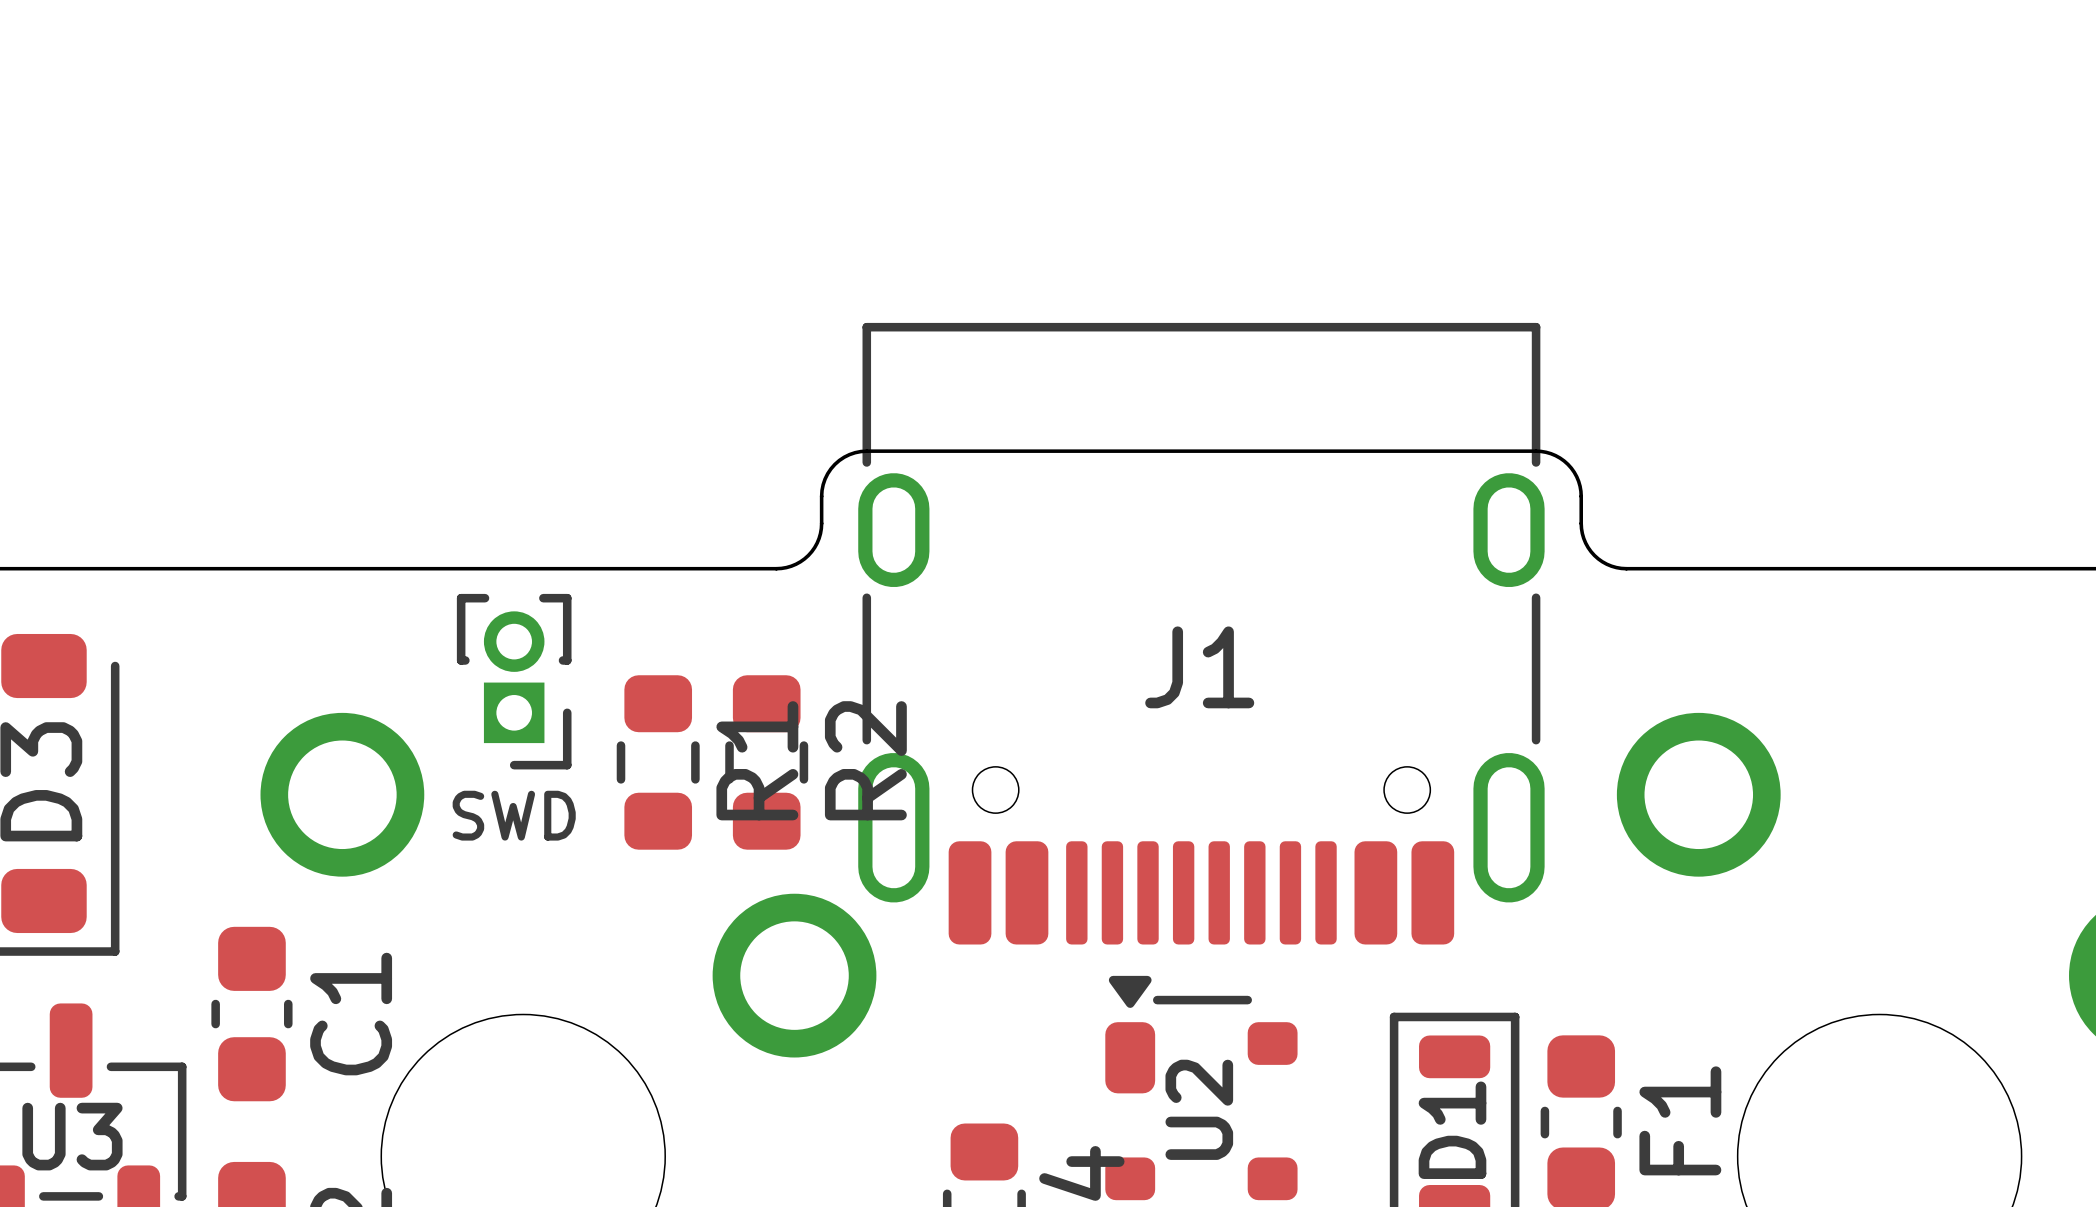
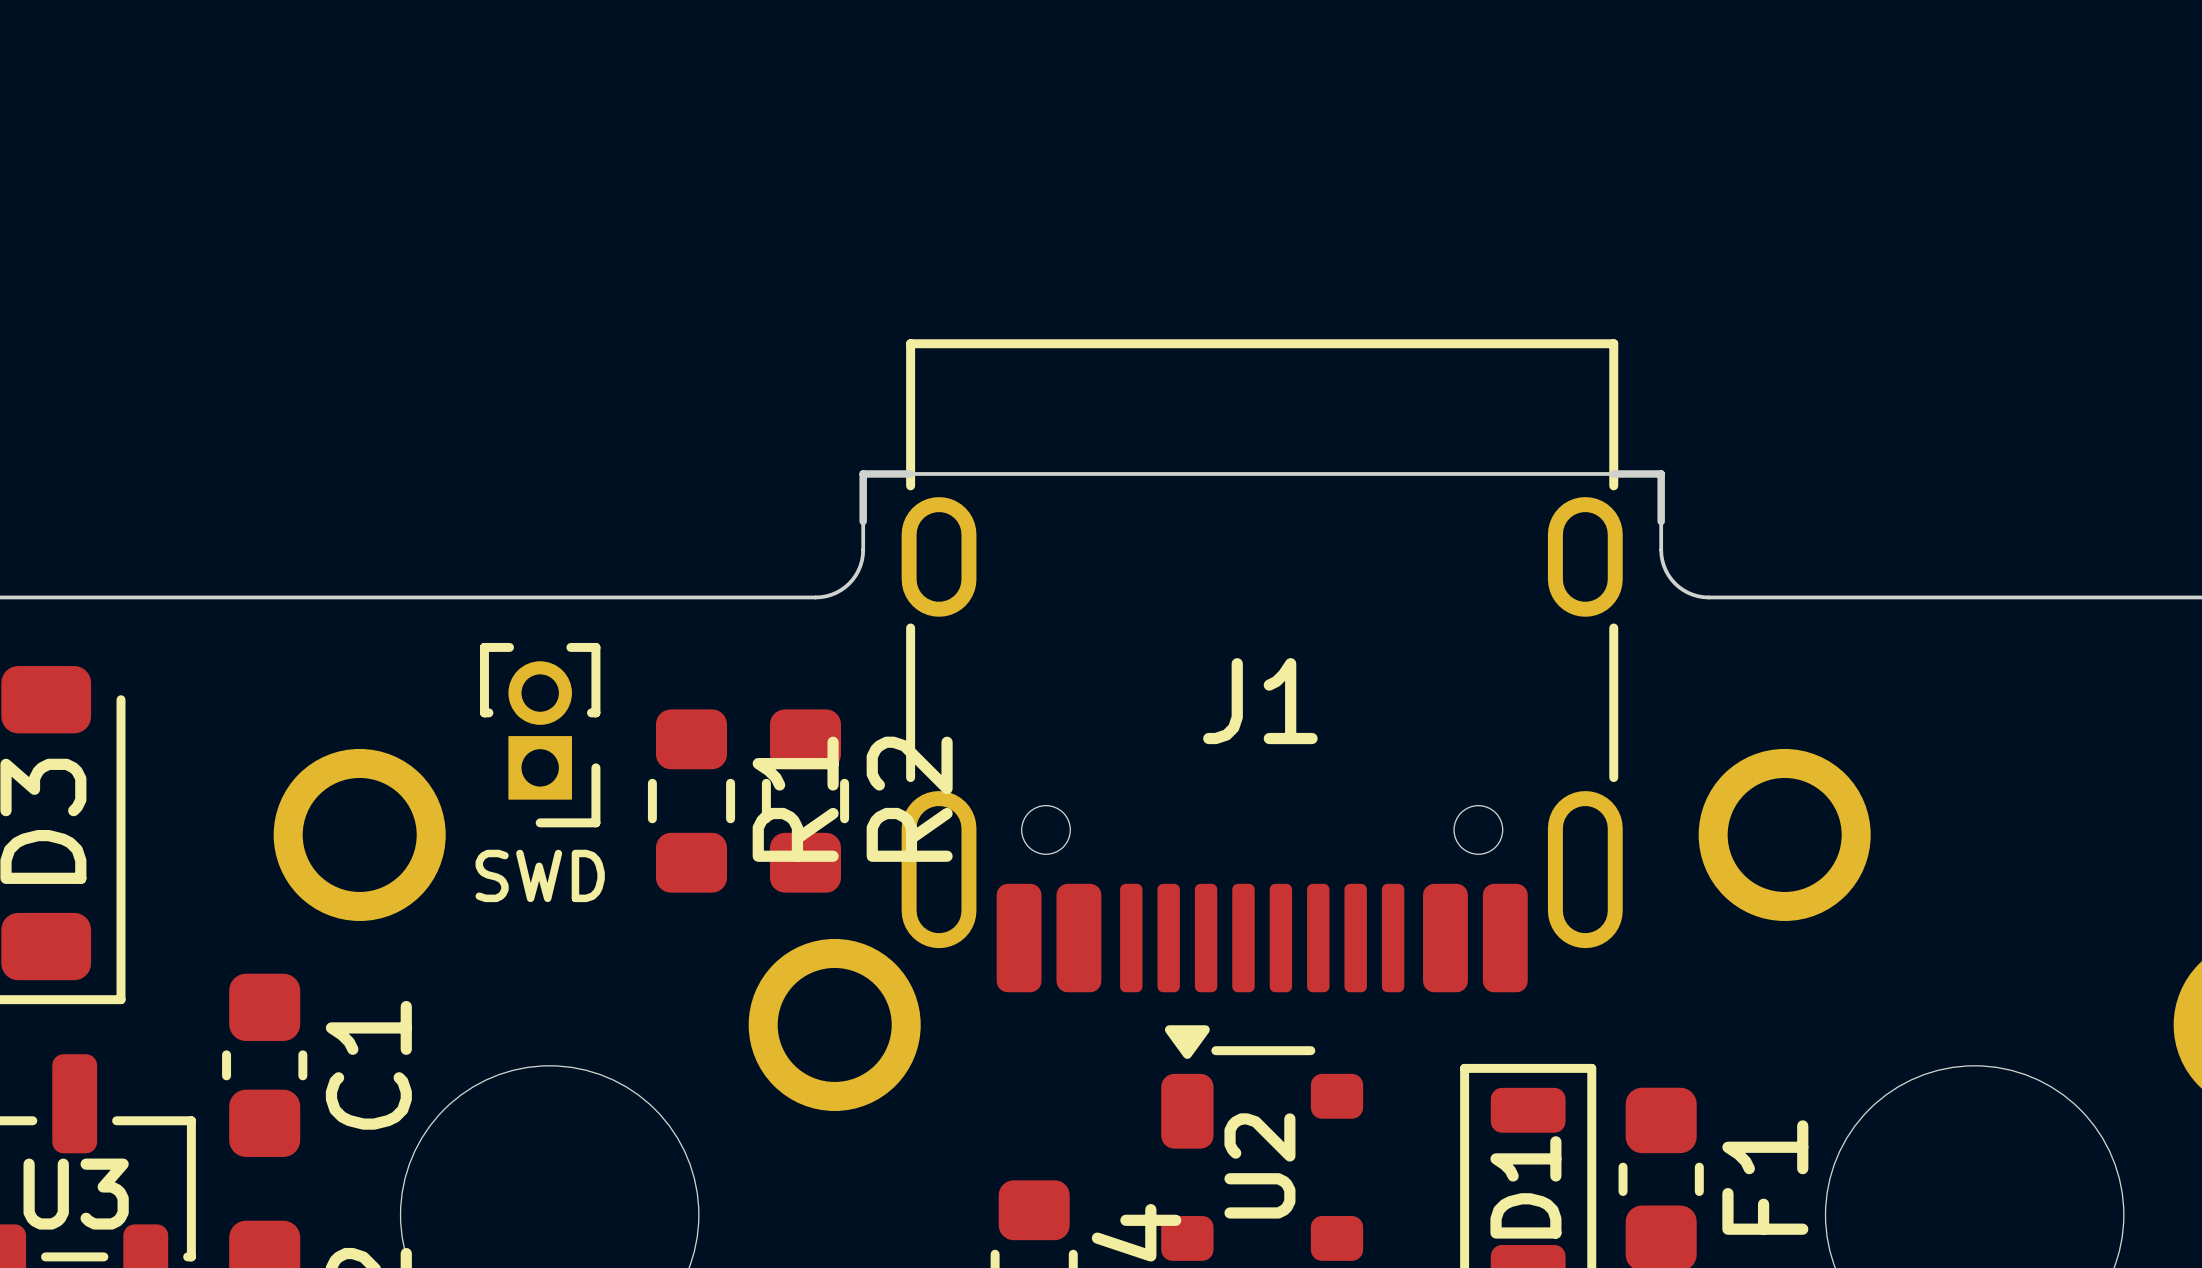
board edge: (866, 451) (849, 454) (834, 464) (825, 479) (821, 496) -> (910, 473) (863, 473) (863, 521)
board edge: (1536, 451) (1550, 453) (1567, 464) (1576, 476) (1581, 496) -> (1613, 473) (1661, 473) (1661, 521)
part position: (514, 681) -> (540, 735)

